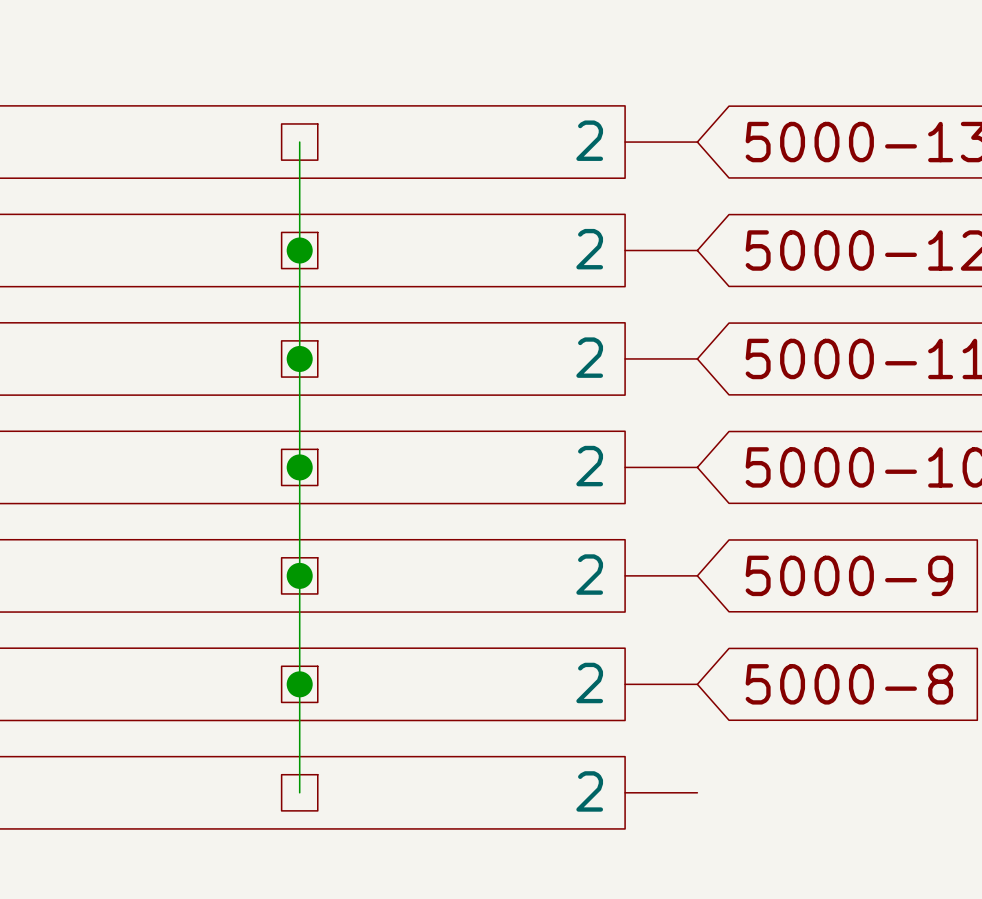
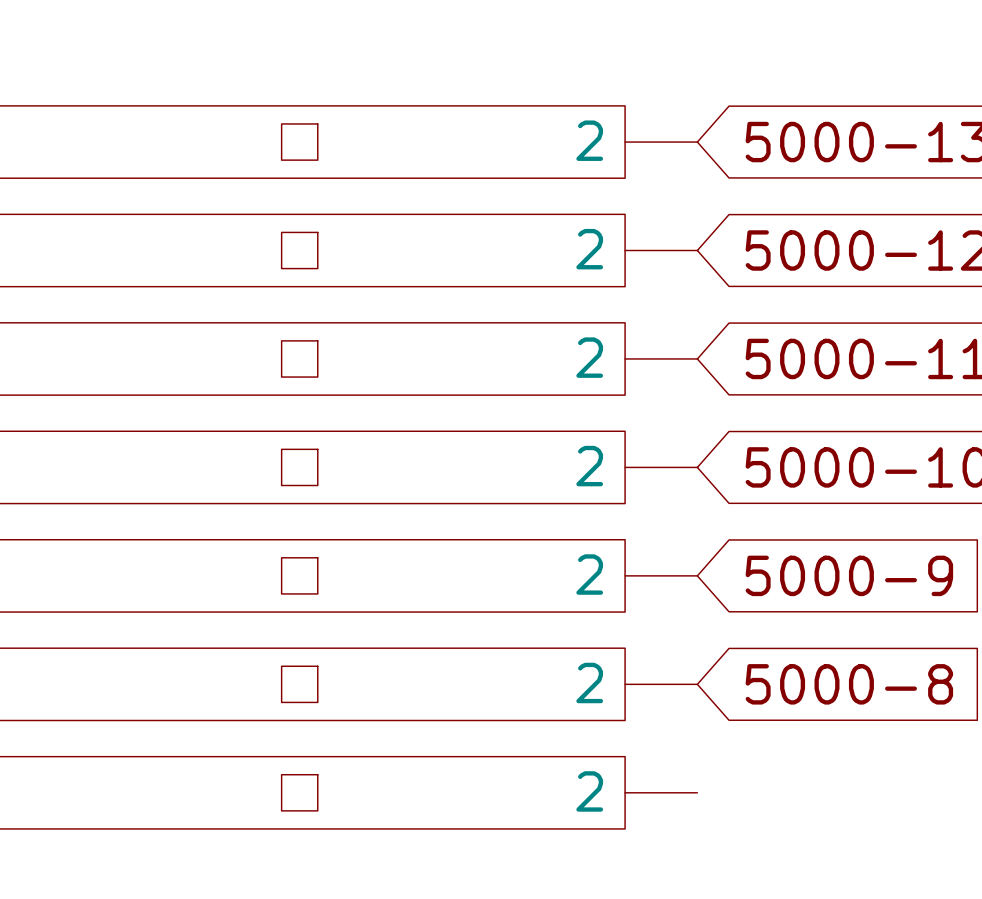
wire: (299, 142) (299, 792) -> none
junction: (299, 250) -> none
junction: (299, 358) -> none
junction: (299, 467) -> none
junction: (299, 575) -> none
junction: (299, 684) -> none

